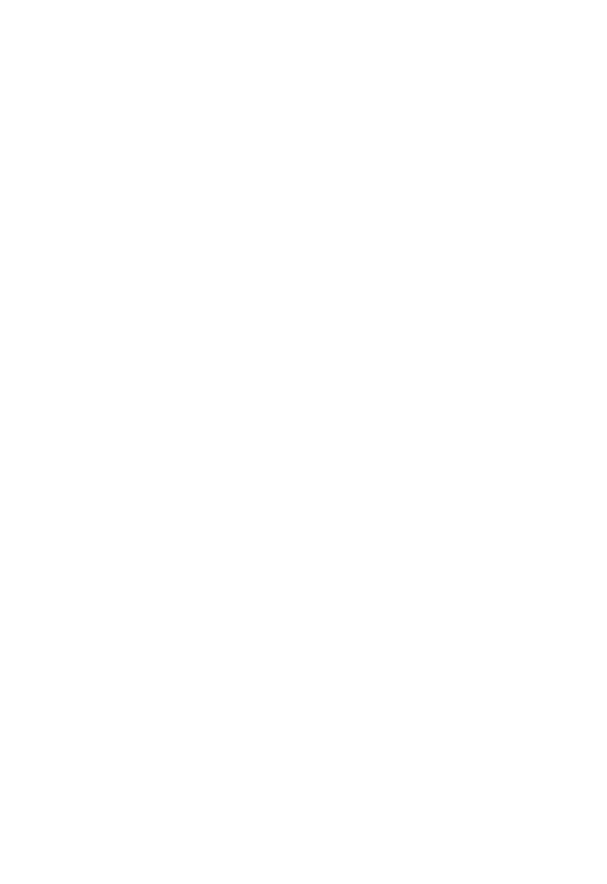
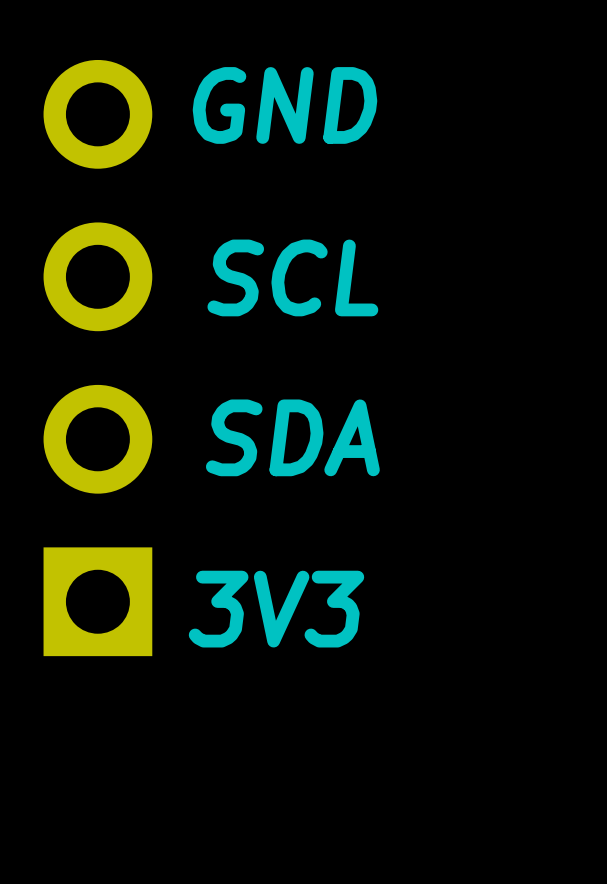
text: none -> GND (284, 105)
text: none -> SCL (292, 277)
part: none -> (97, 358)
text: none -> SDA (292, 437)
text: none -> 3V3 (276, 609)

